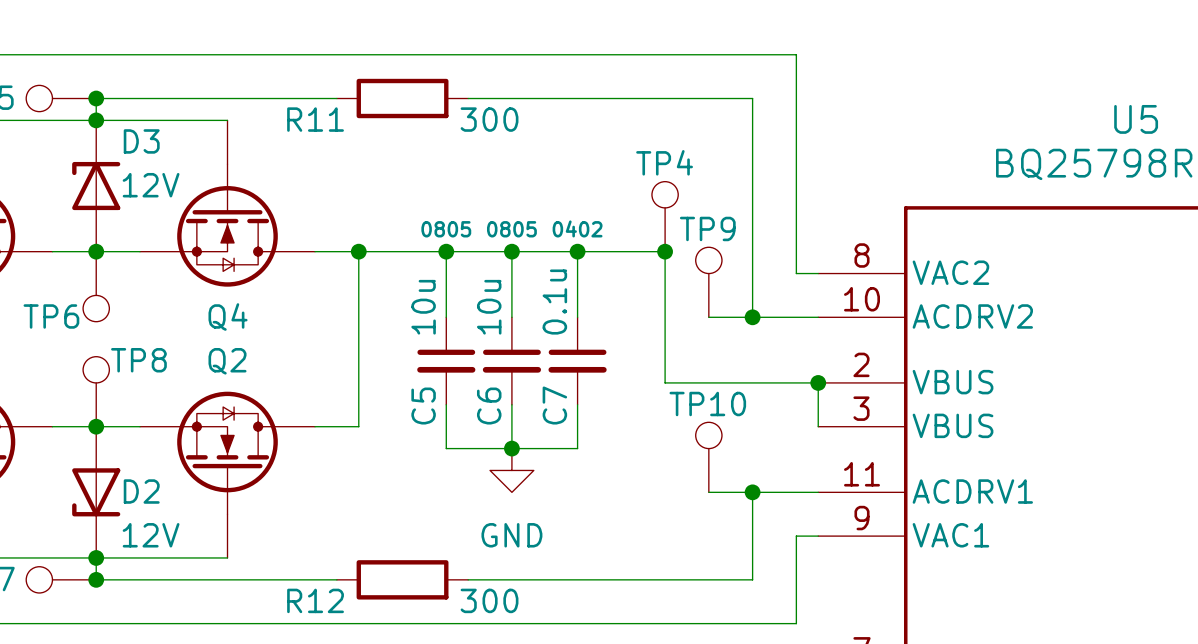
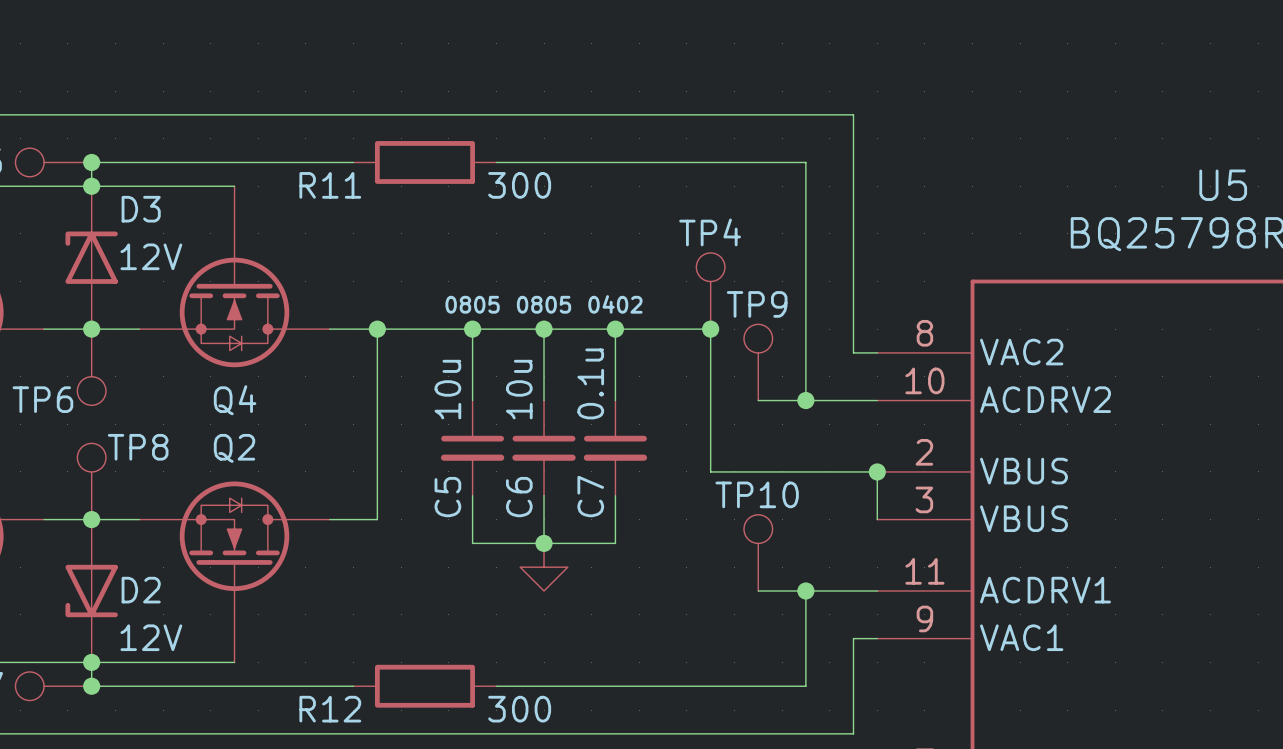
power symbol text: GND (511, 535) -> none

